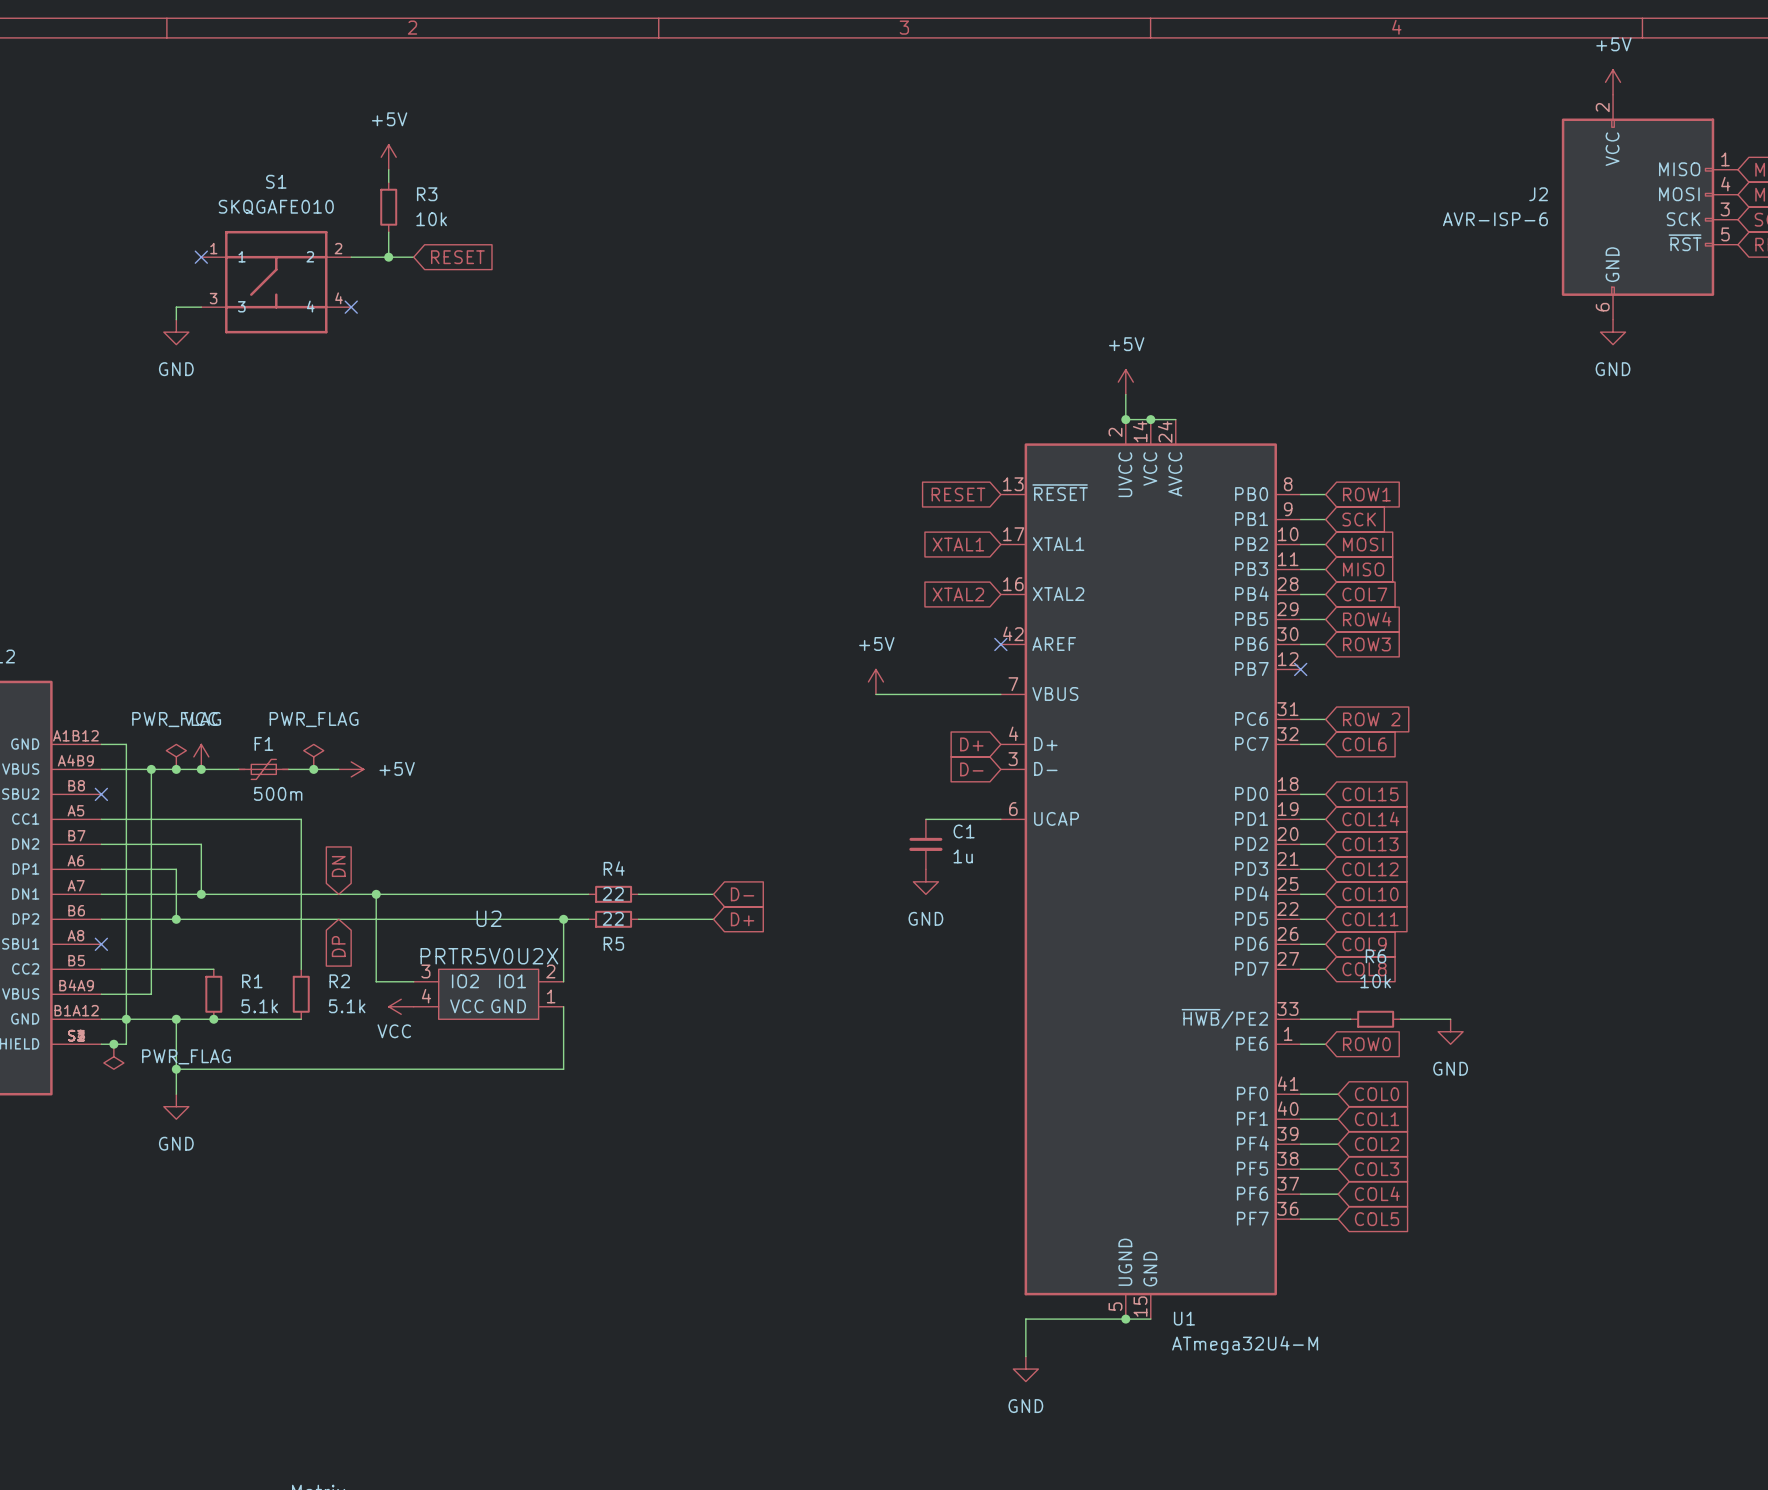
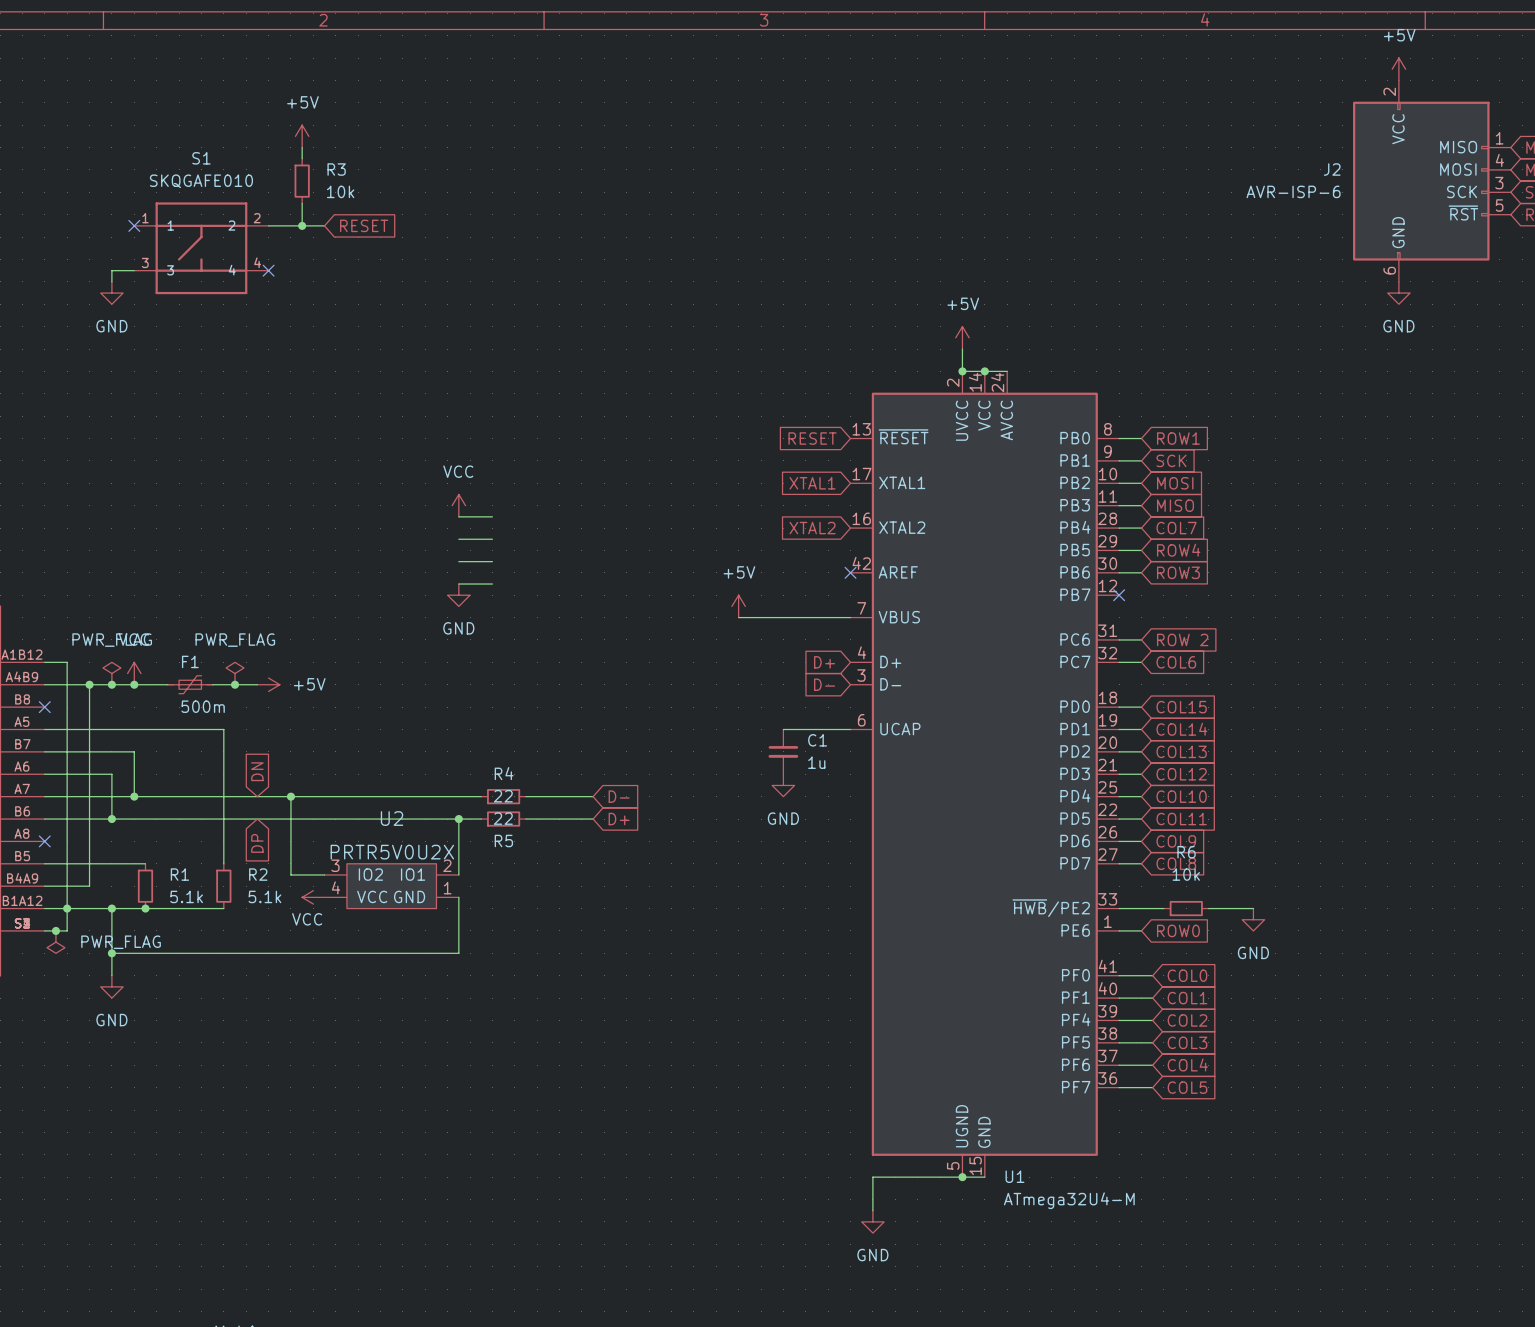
power symbol: none -> VCC (458, 505)
wire: none -> (458, 516) (492, 516)
wire: none -> (458, 539) (492, 539)
wire: none -> (458, 561) (492, 561)
wire: none -> (458, 584) (492, 584)
power symbol: none -> GND (458, 595)

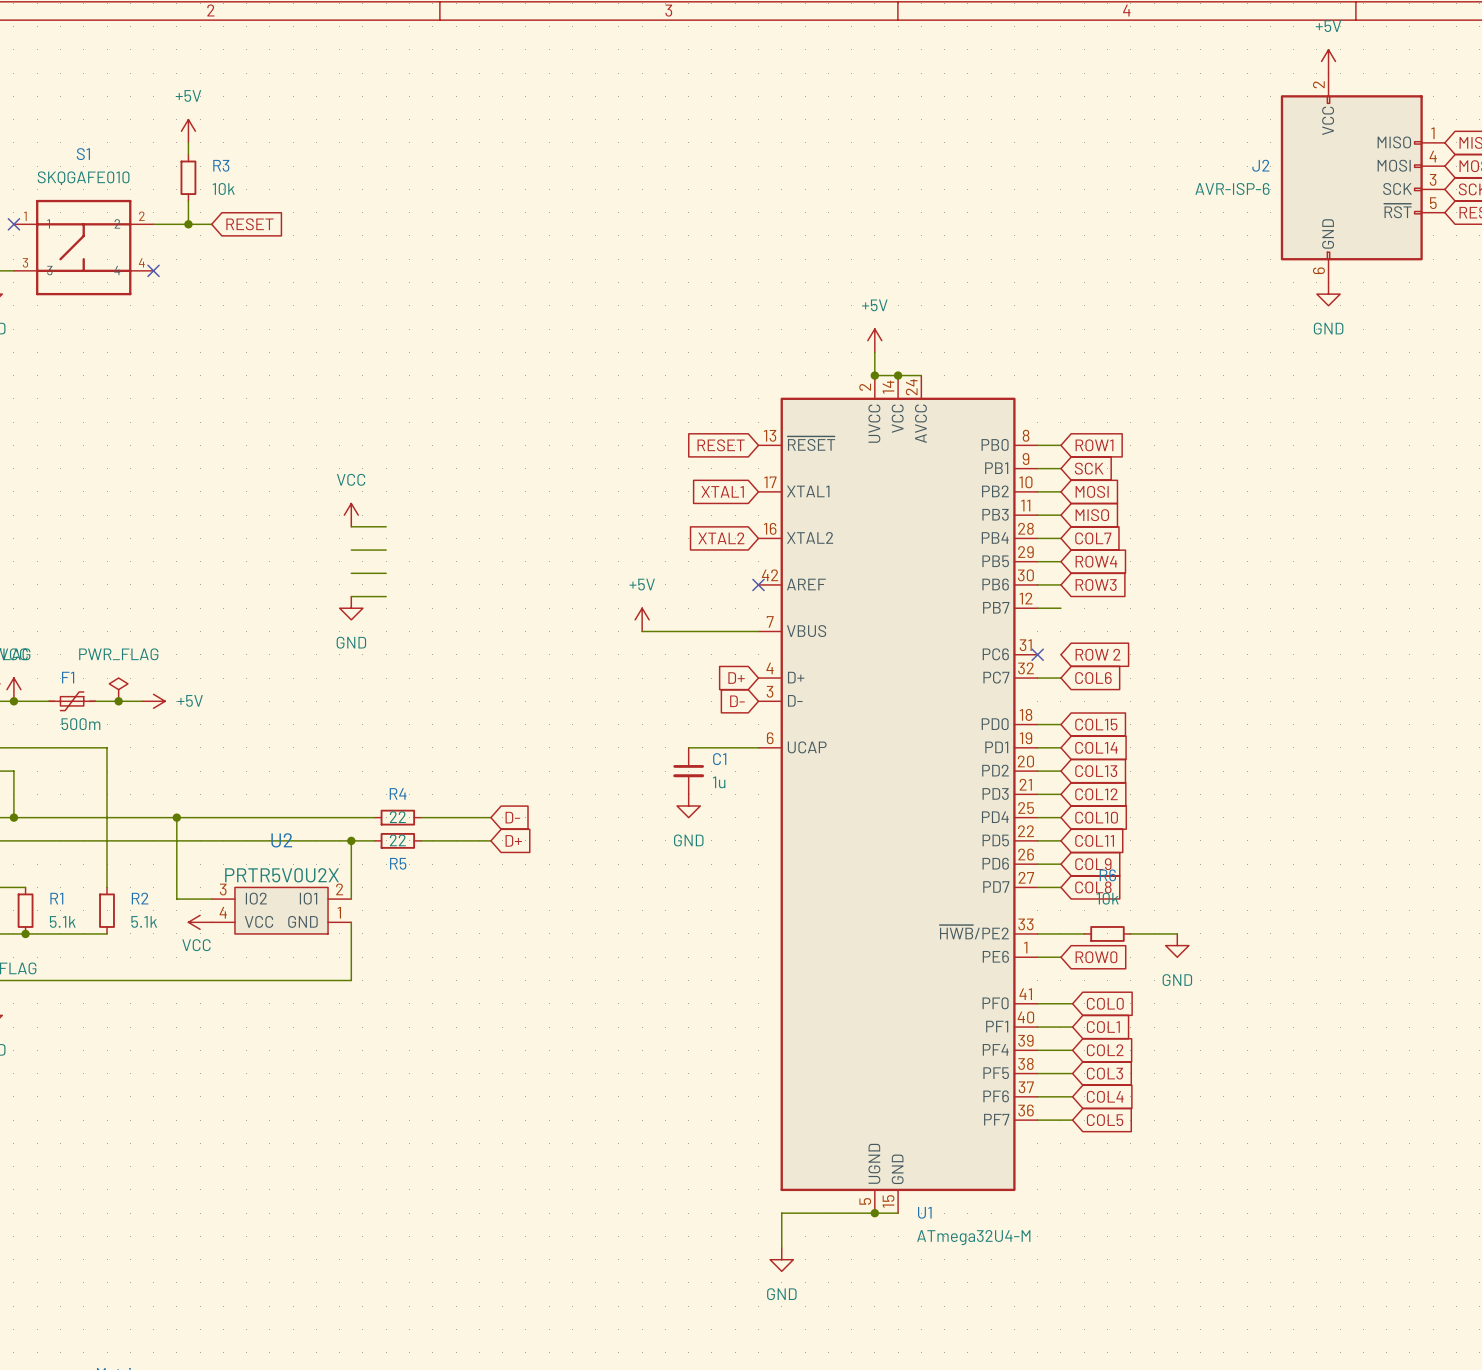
no-connect mark position: (1119, 595) -> (1037, 654)
wire: (1119, 639) (1141, 639) -> (1037, 608) (1060, 608)
global label: DN (257, 771) -> none
global label: DP (257, 843) -> none

